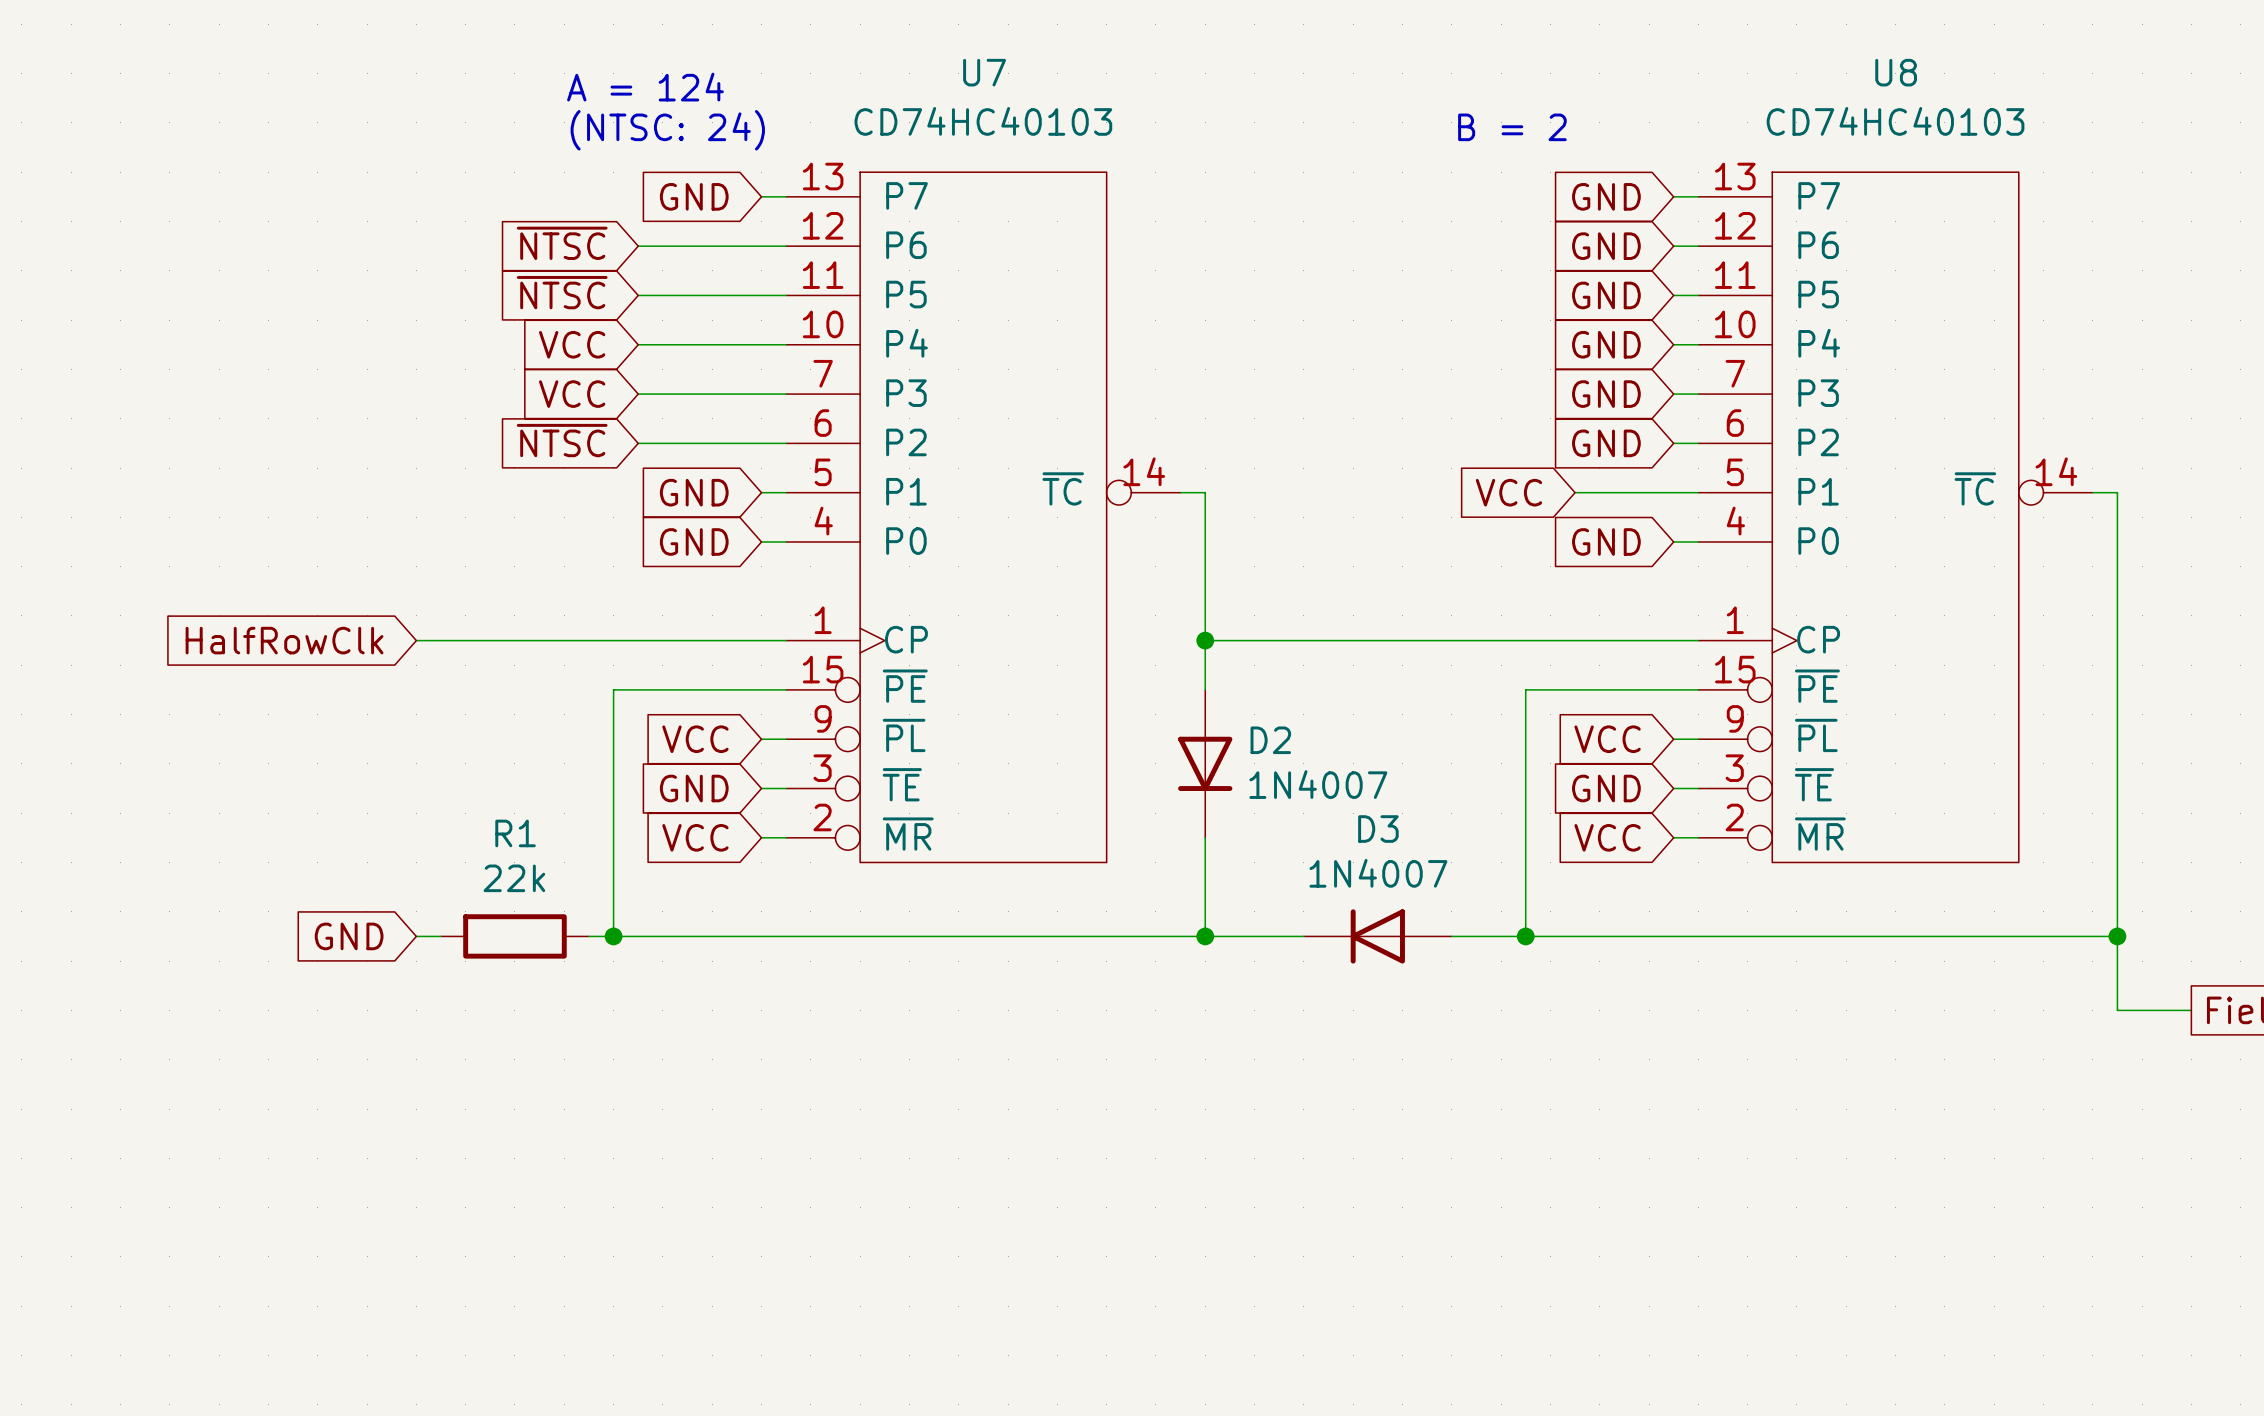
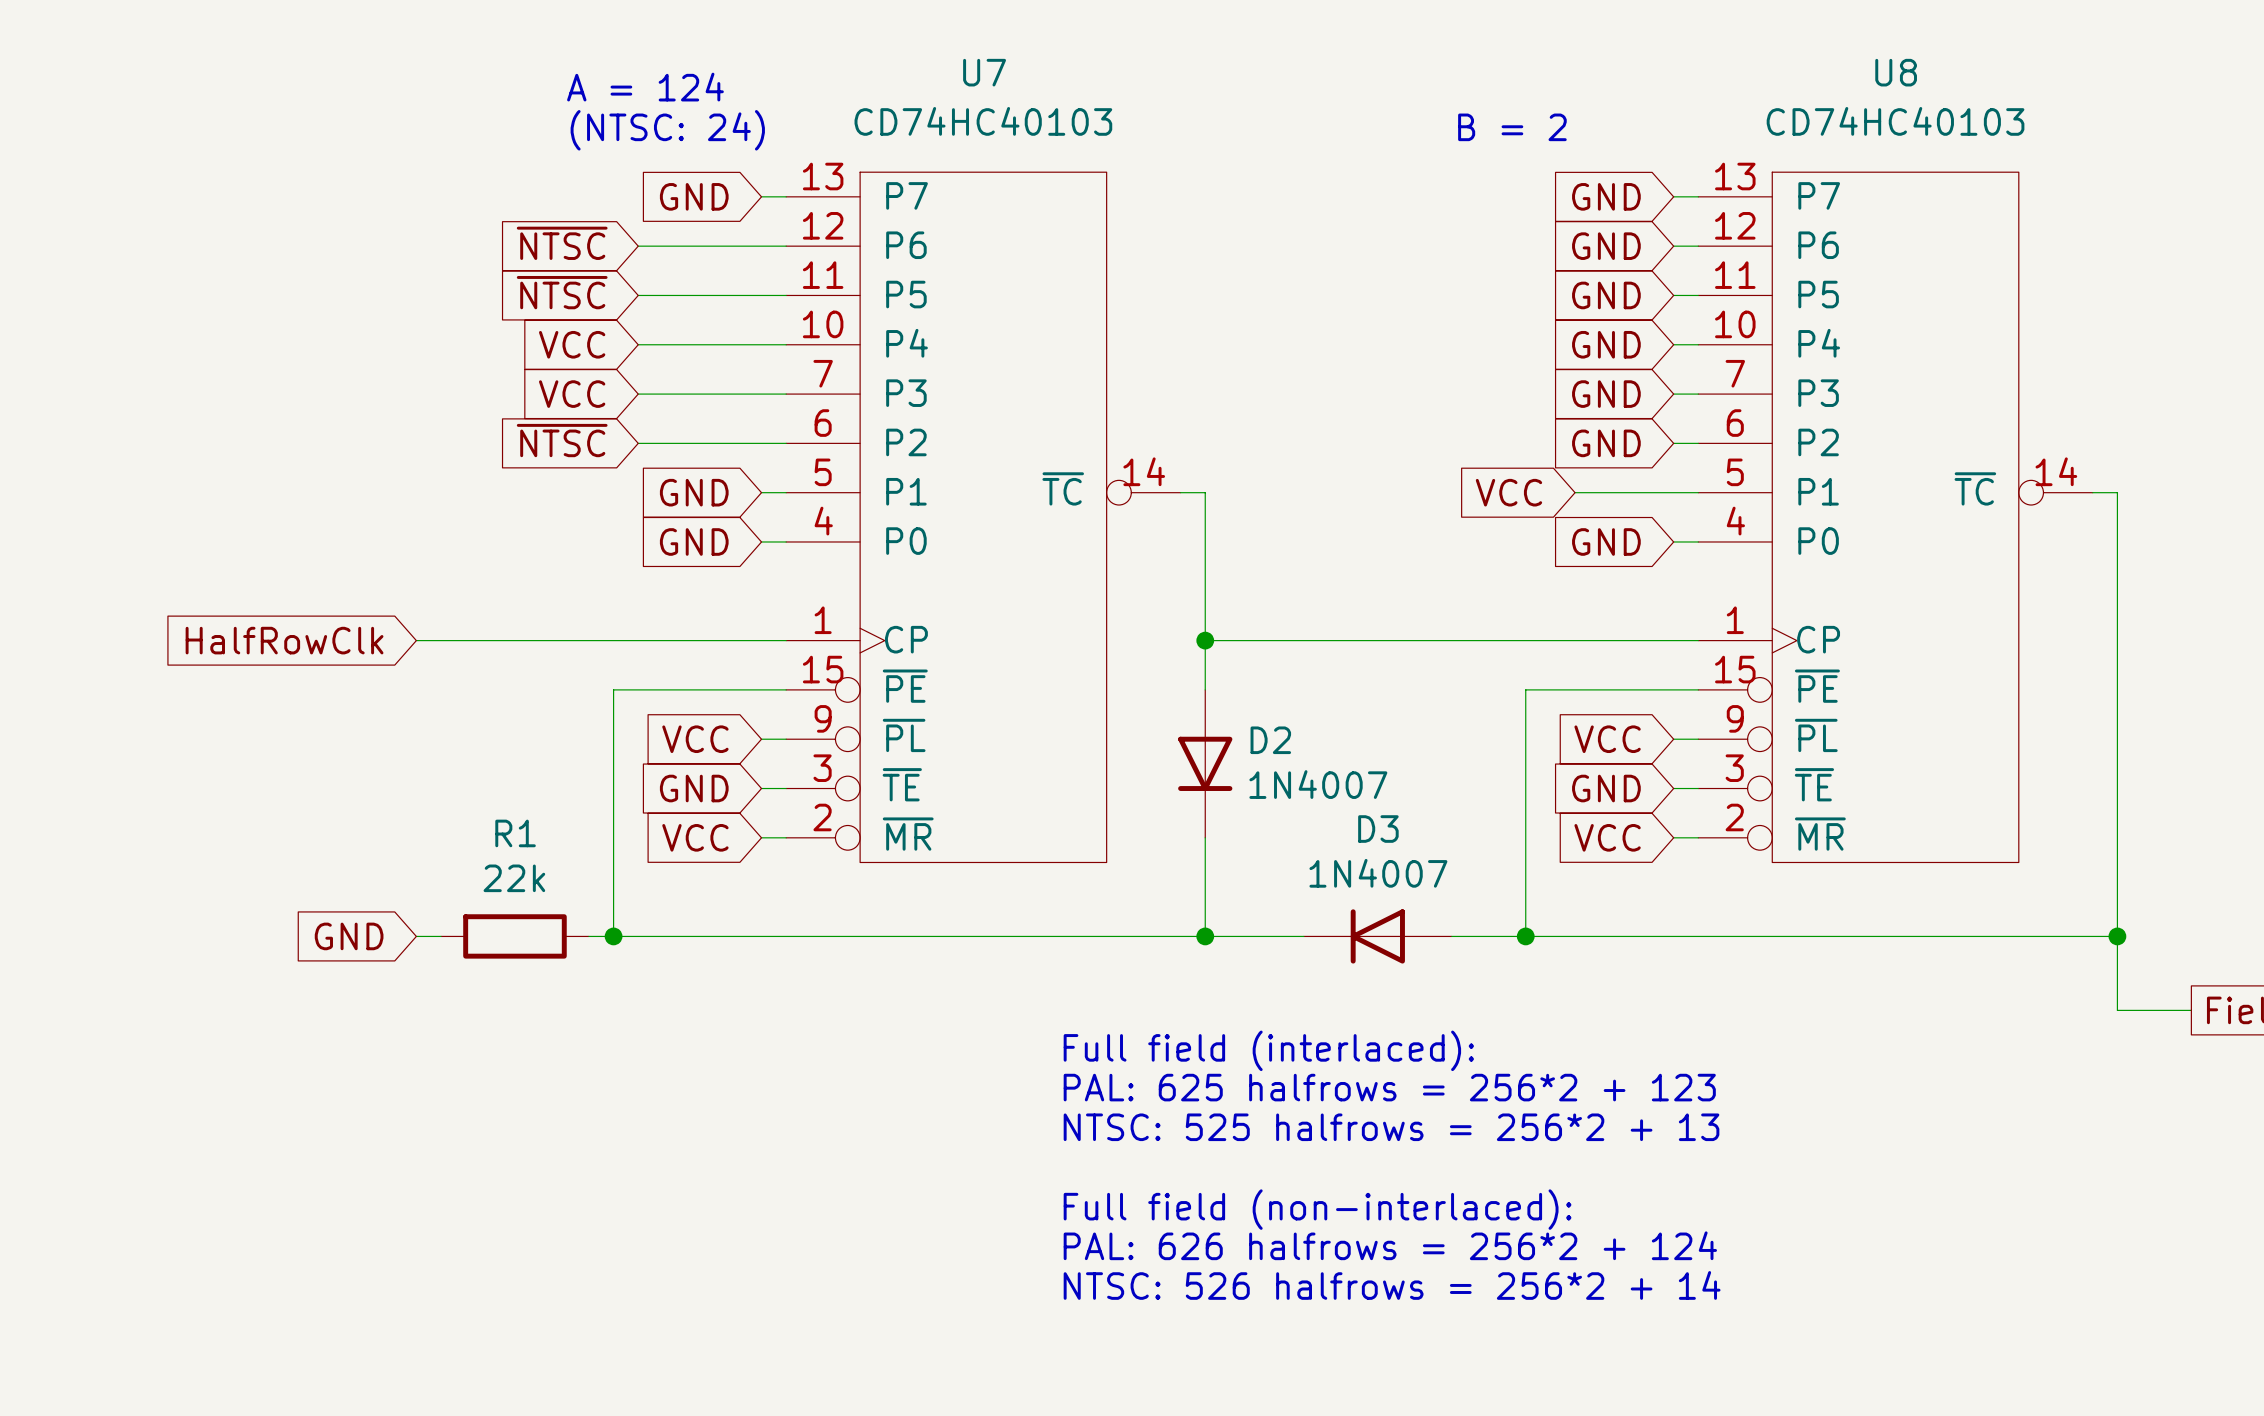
text: none -> Full field (interlaced): (1268, 1050)
text: none -> PAL: 625 halfrows = 256*2 + 123 (1389, 1087)
text: none -> NTSC: 525 halfrows = 256*2 + 13 (1391, 1127)
text: none -> Full field (non-interlaced): (1317, 1209)
text: none -> PAL: 626 halfrows = 256*2 + 124 (1390, 1245)
text: none -> NTSC: 526 halfrows = 256*2 + 14 (1392, 1285)

